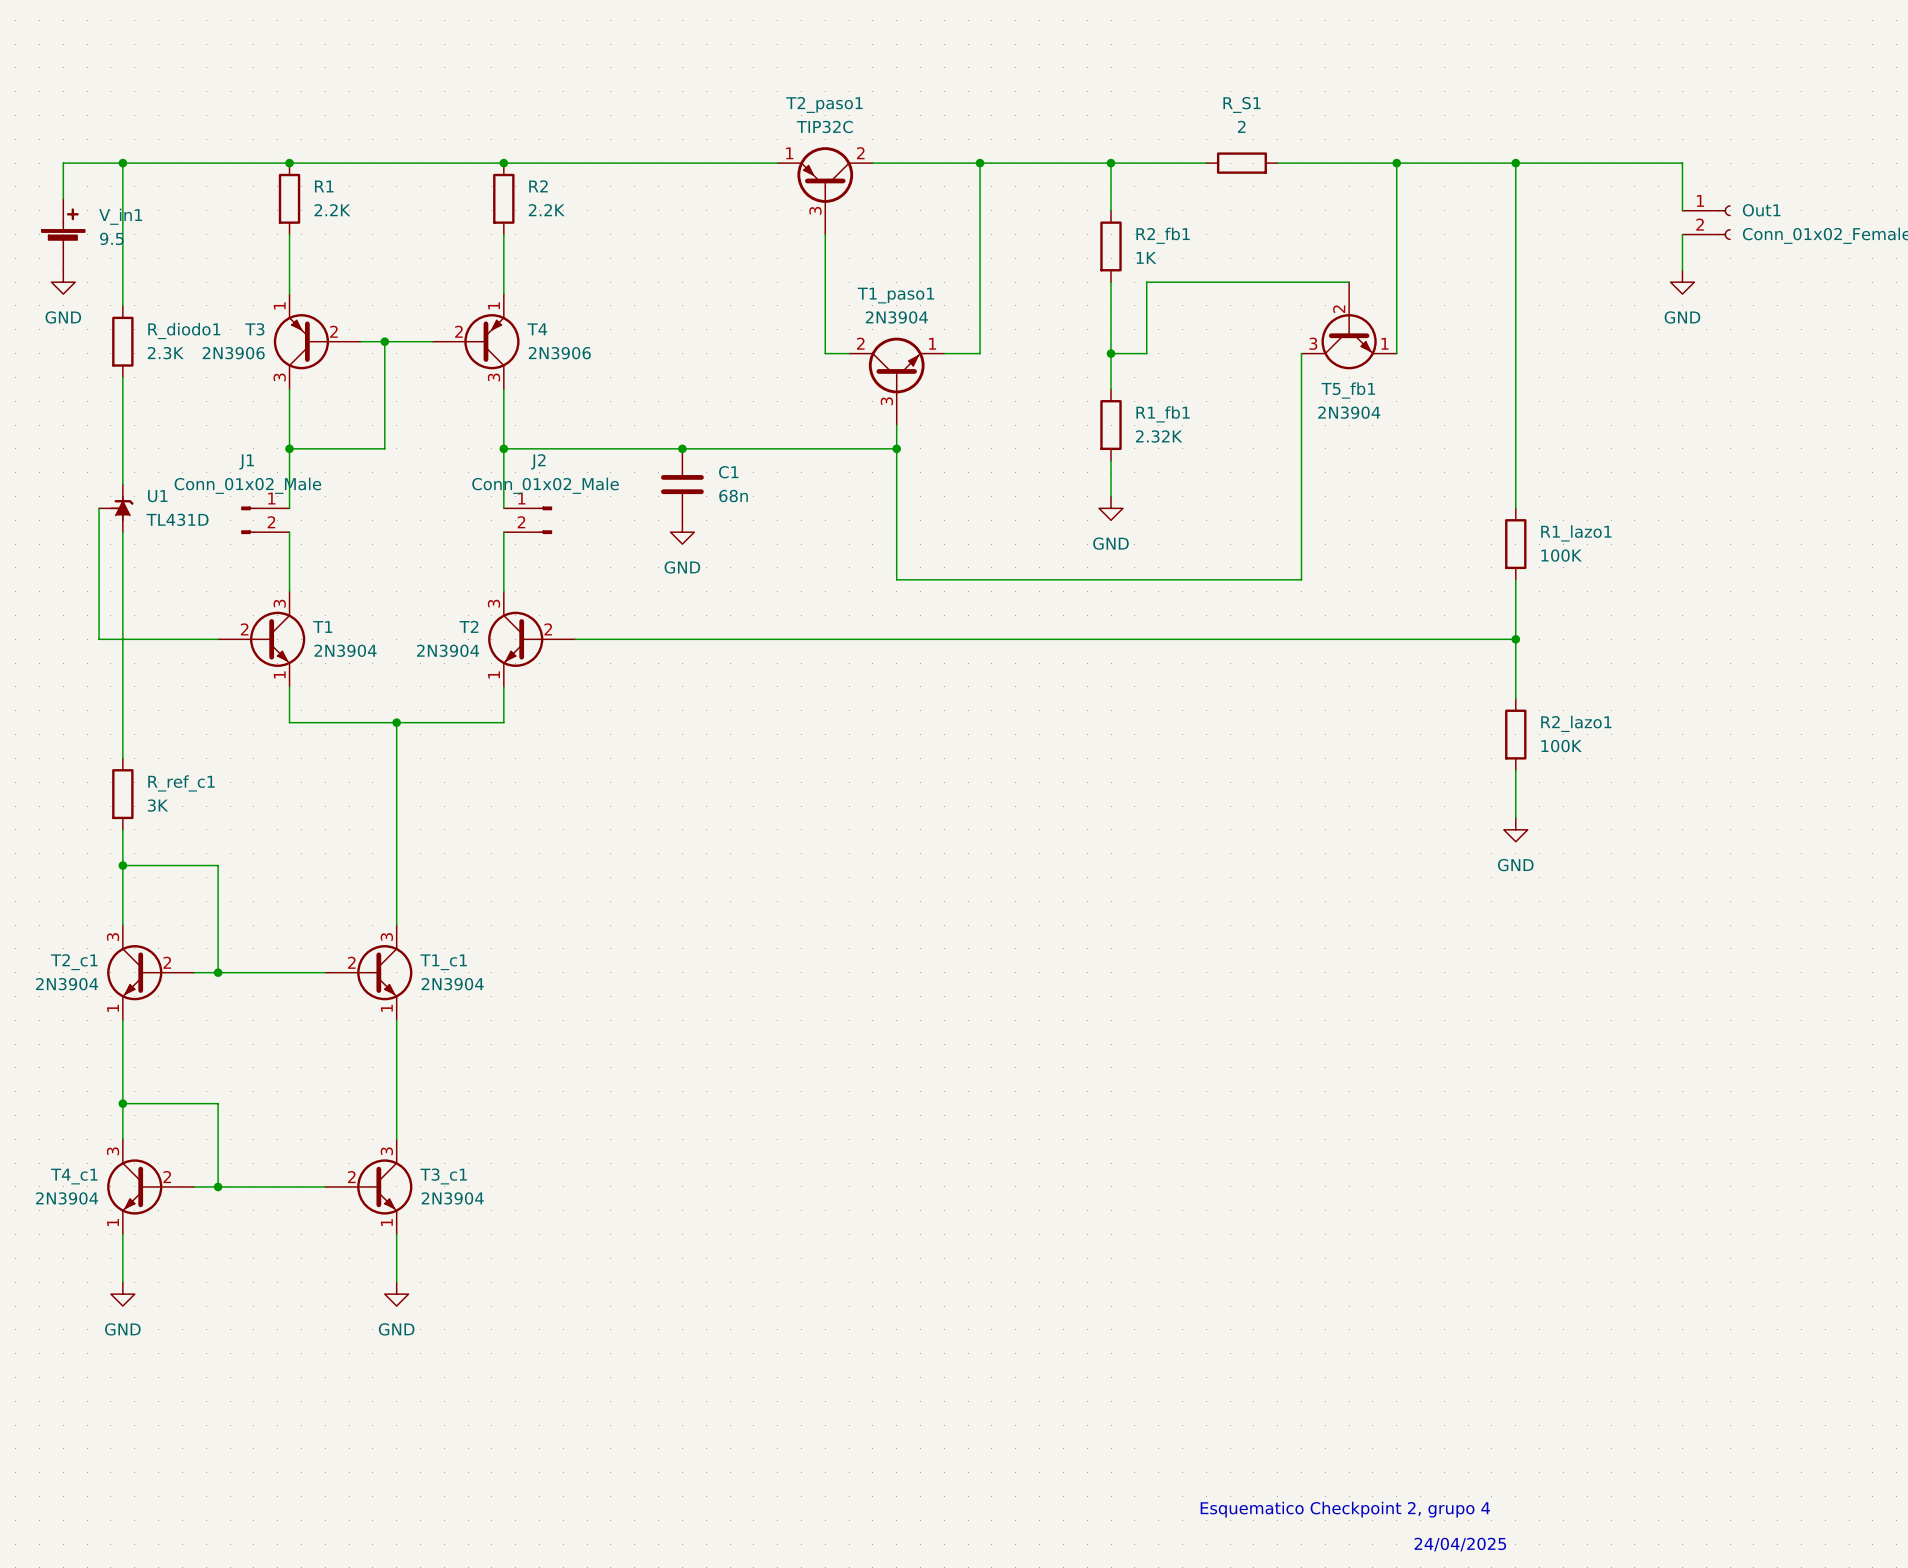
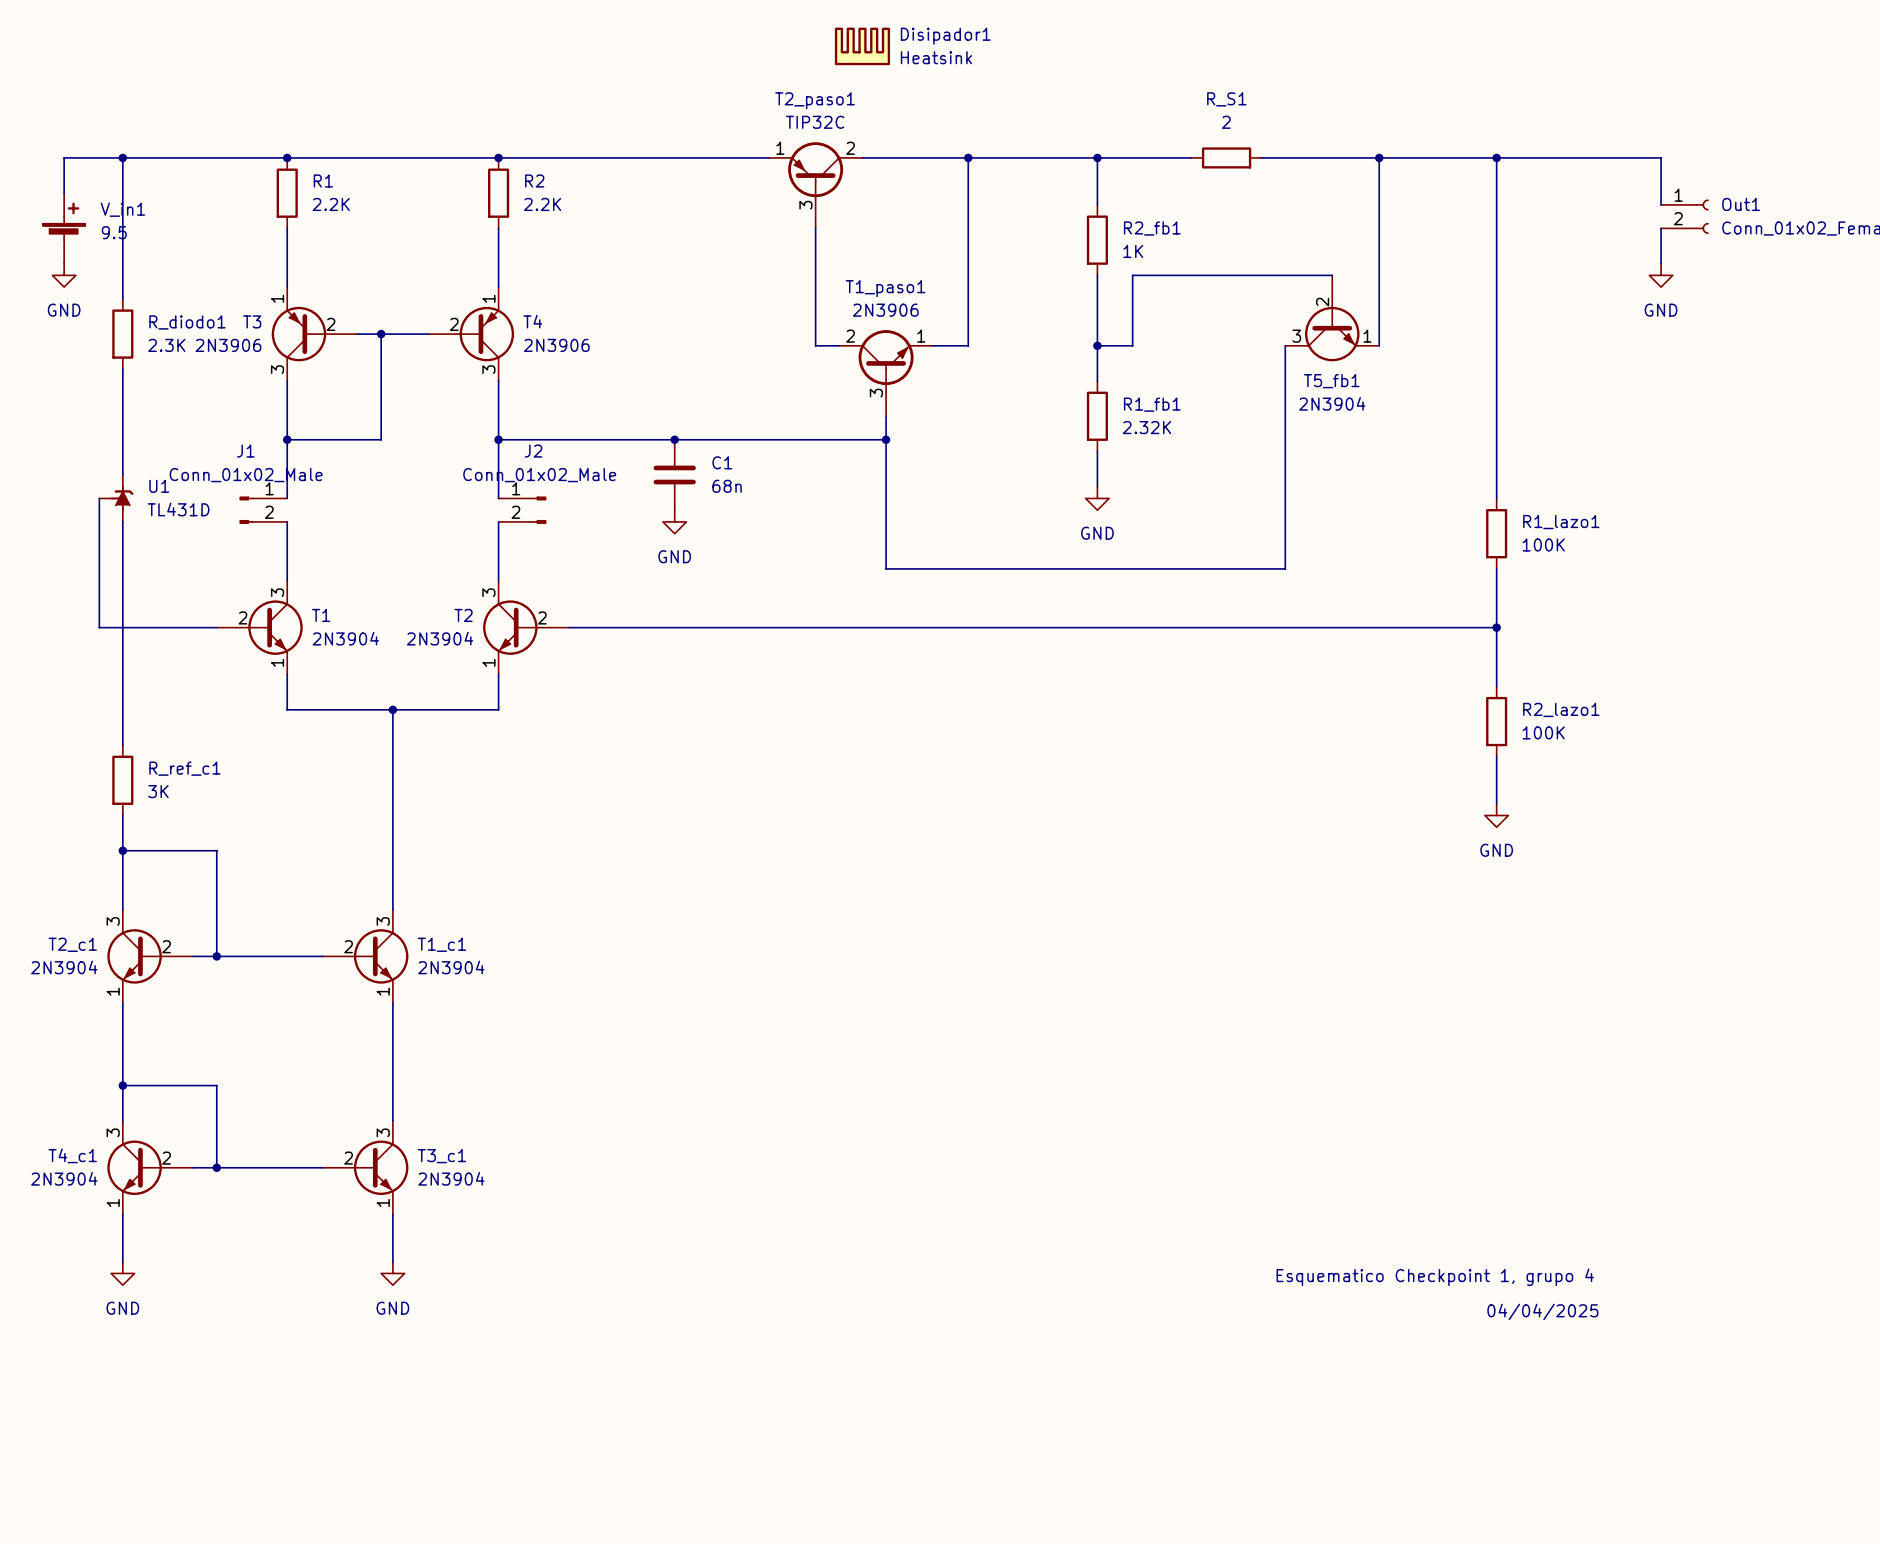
Disipador1: none -> Heatsink (862, 46)
T1_paso1 value: 2N3904 (896, 317) -> 2N3906 (885, 310)
text: none -> Esquematico Checkpoint 1, grupo 4 (1435, 1277)
text: none -> 04/04/2025 (1542, 1311)
text: Esquematico Checkpoint 2, grupo 4 (1345, 1509) -> none
text: 24/04/2025 (1460, 1544) -> none

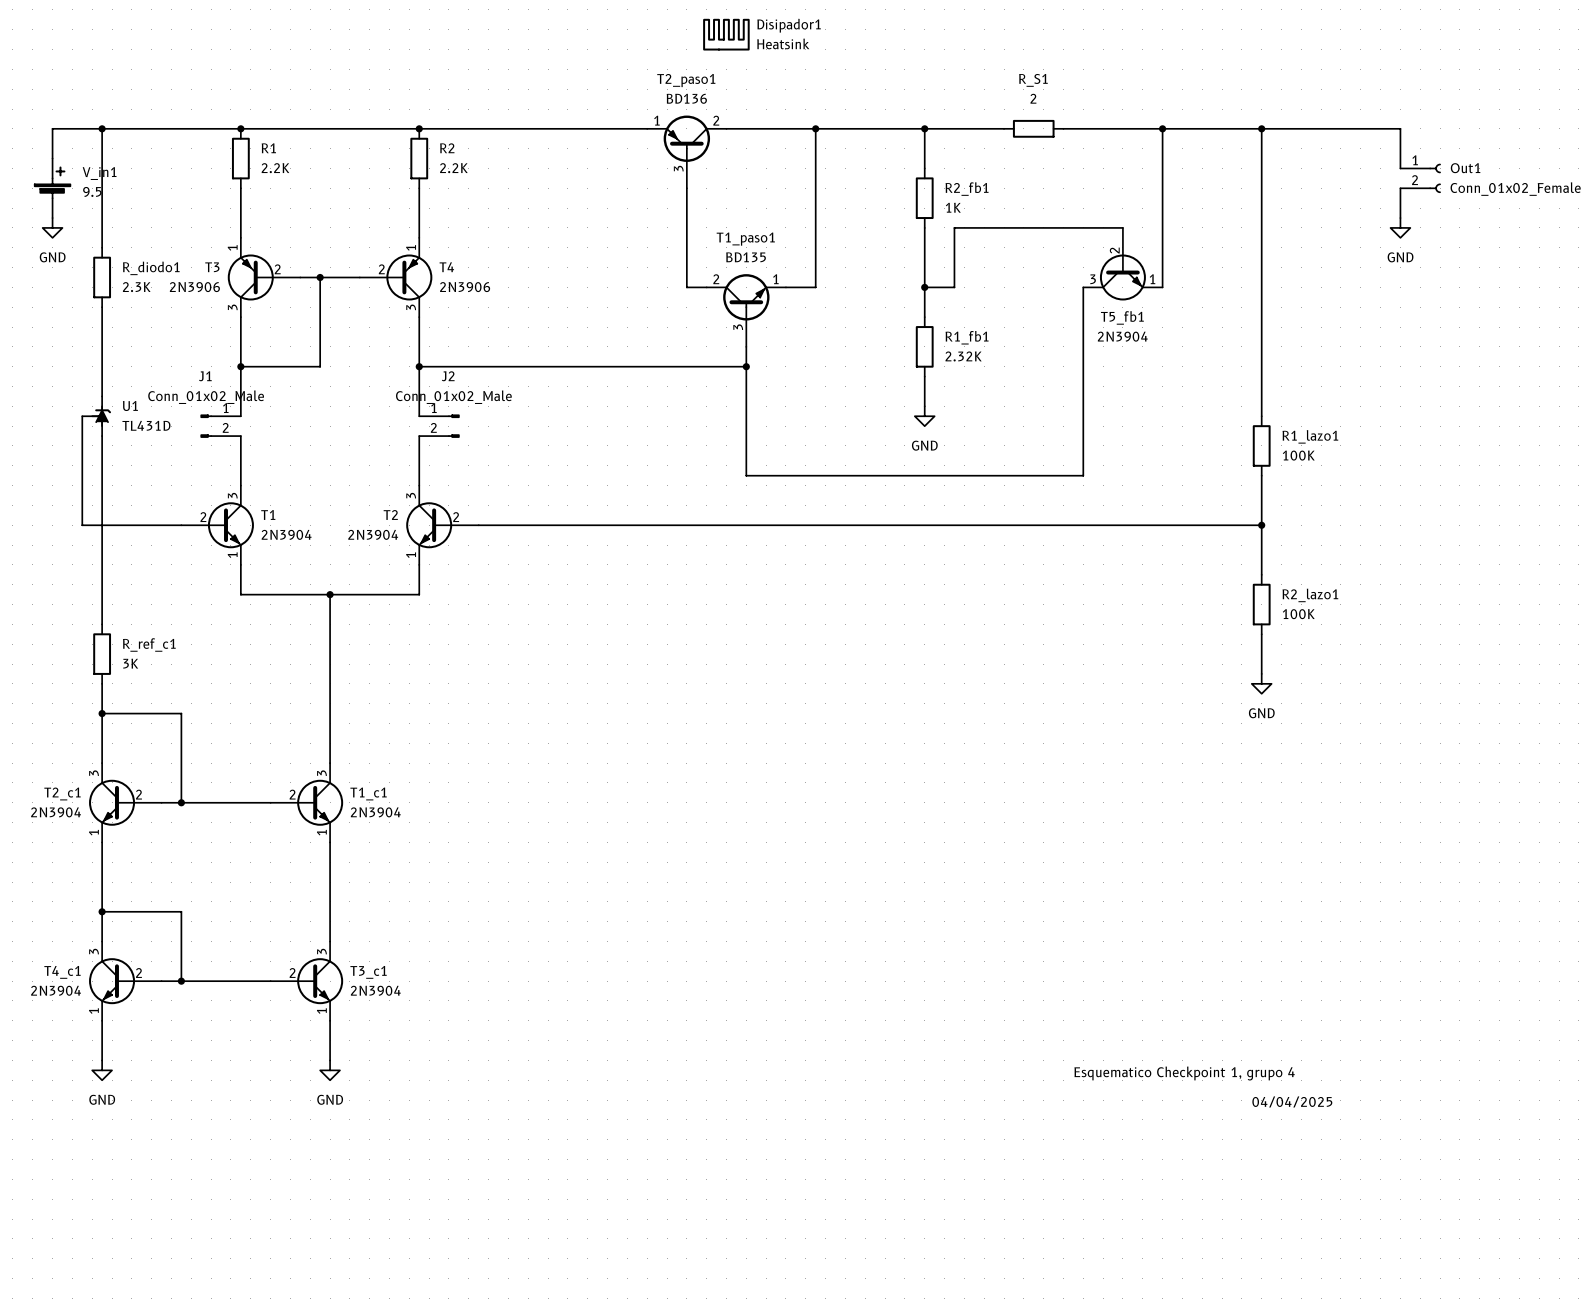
T2_paso1 value: TIP32C (815, 122) -> BD136 (686, 98)
T1_paso1 value: 2N3906 (885, 310) -> BD135 (746, 257)
junction: (674, 439) -> none
C1: 68n (674, 474) -> none
power symbol: GND (674, 521) -> none

